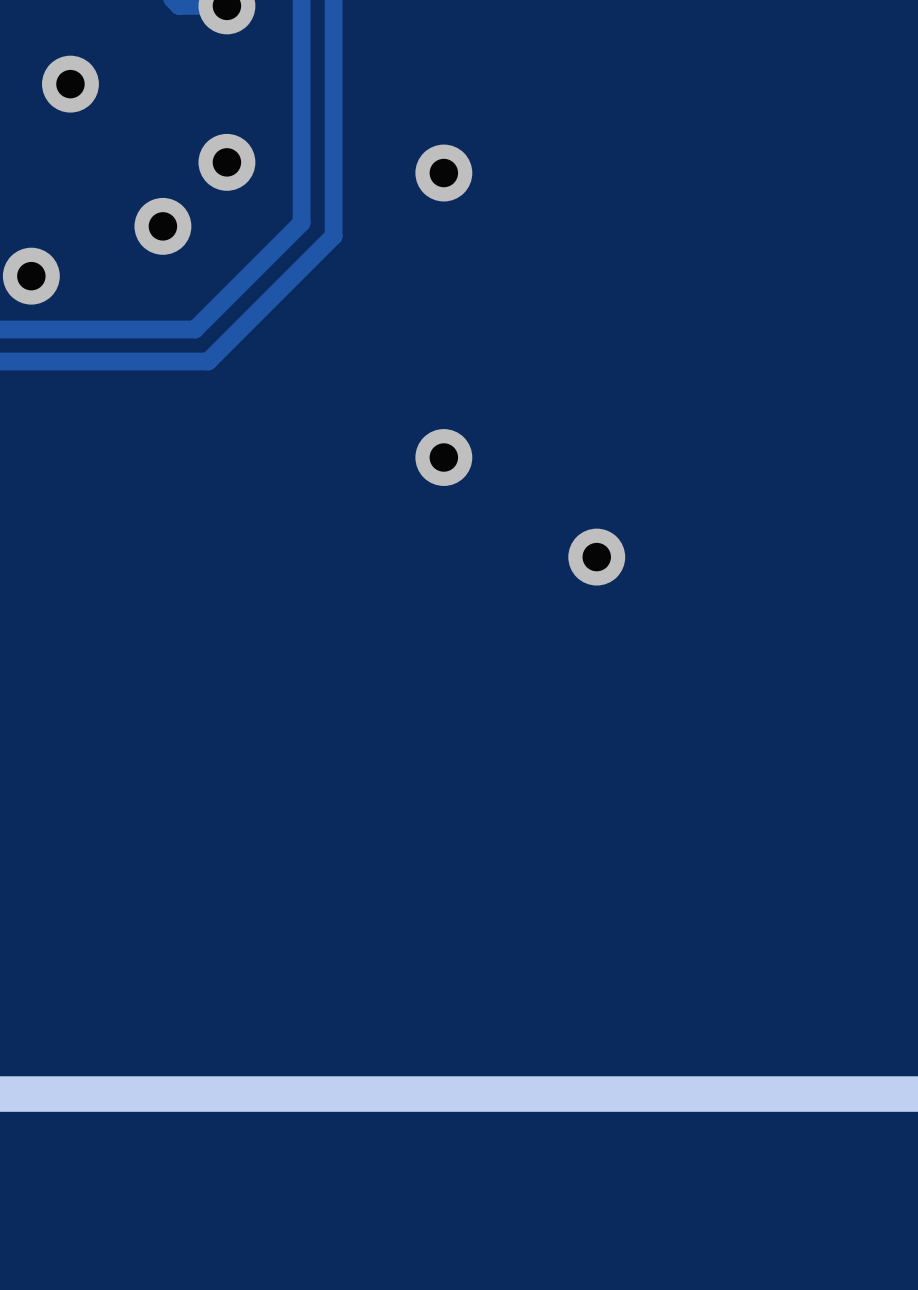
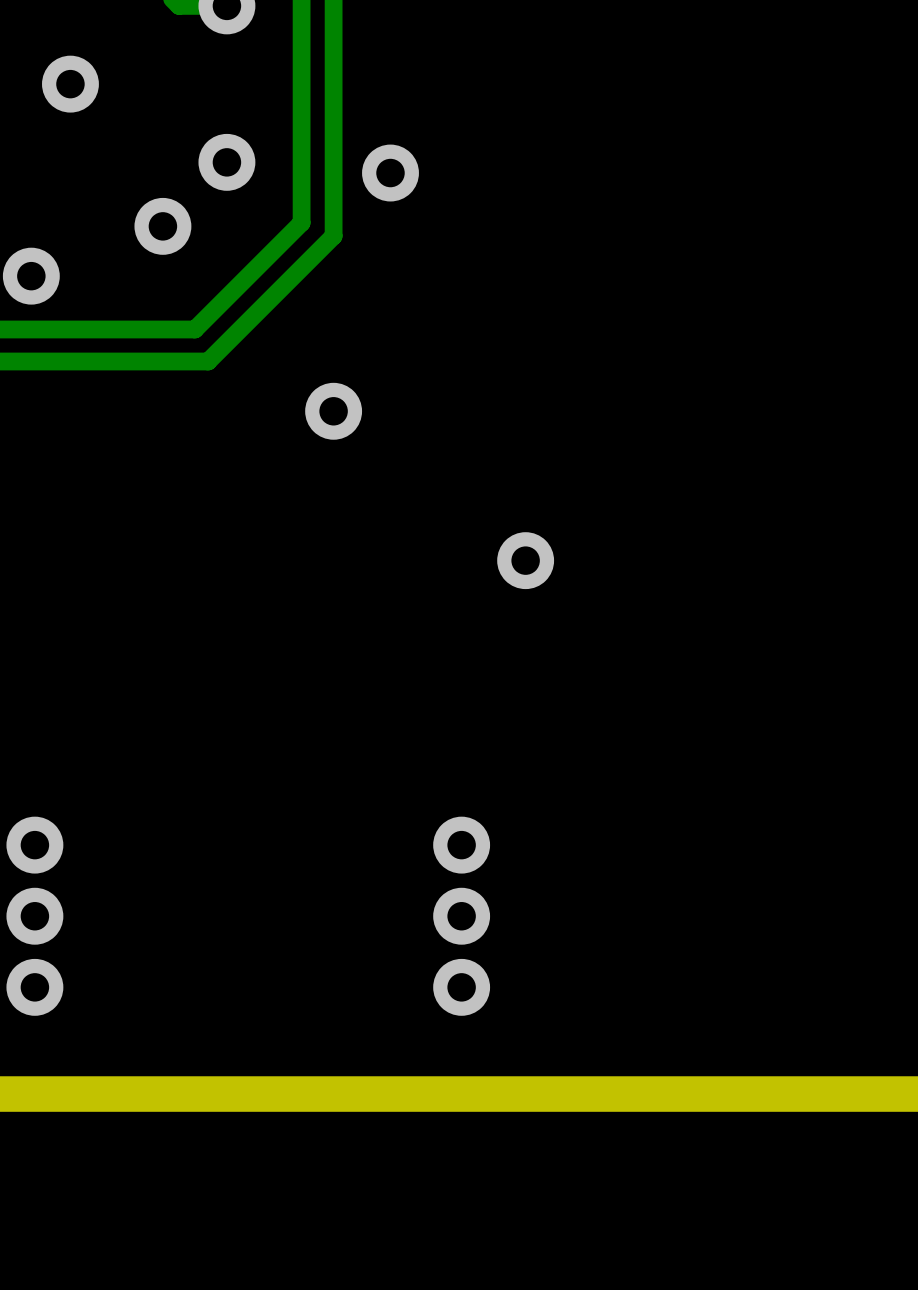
via position: (443, 173) -> (390, 173)
via: none -> (333, 411)
via: (443, 457) -> none
via: (596, 557) -> none
via: none -> (525, 560)
via: none -> (34, 845)
via: none -> (461, 845)
via: none -> (34, 916)
via: none -> (461, 916)
via: none -> (34, 987)
via: none -> (461, 987)

